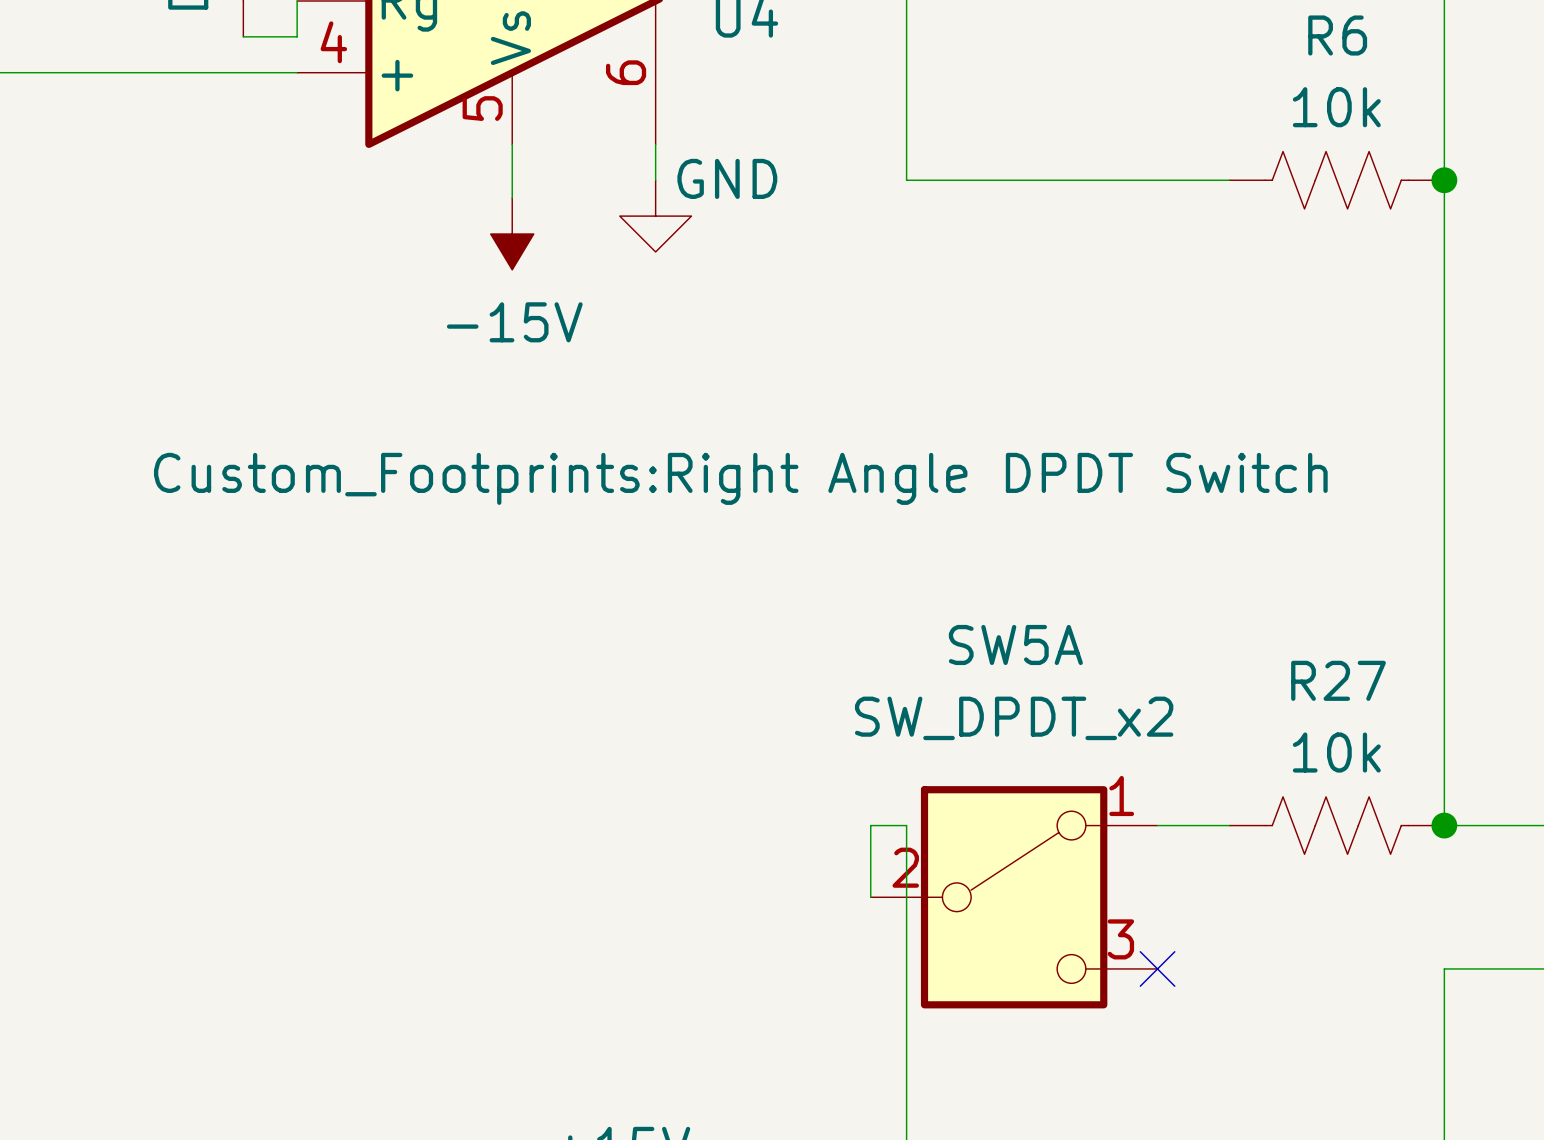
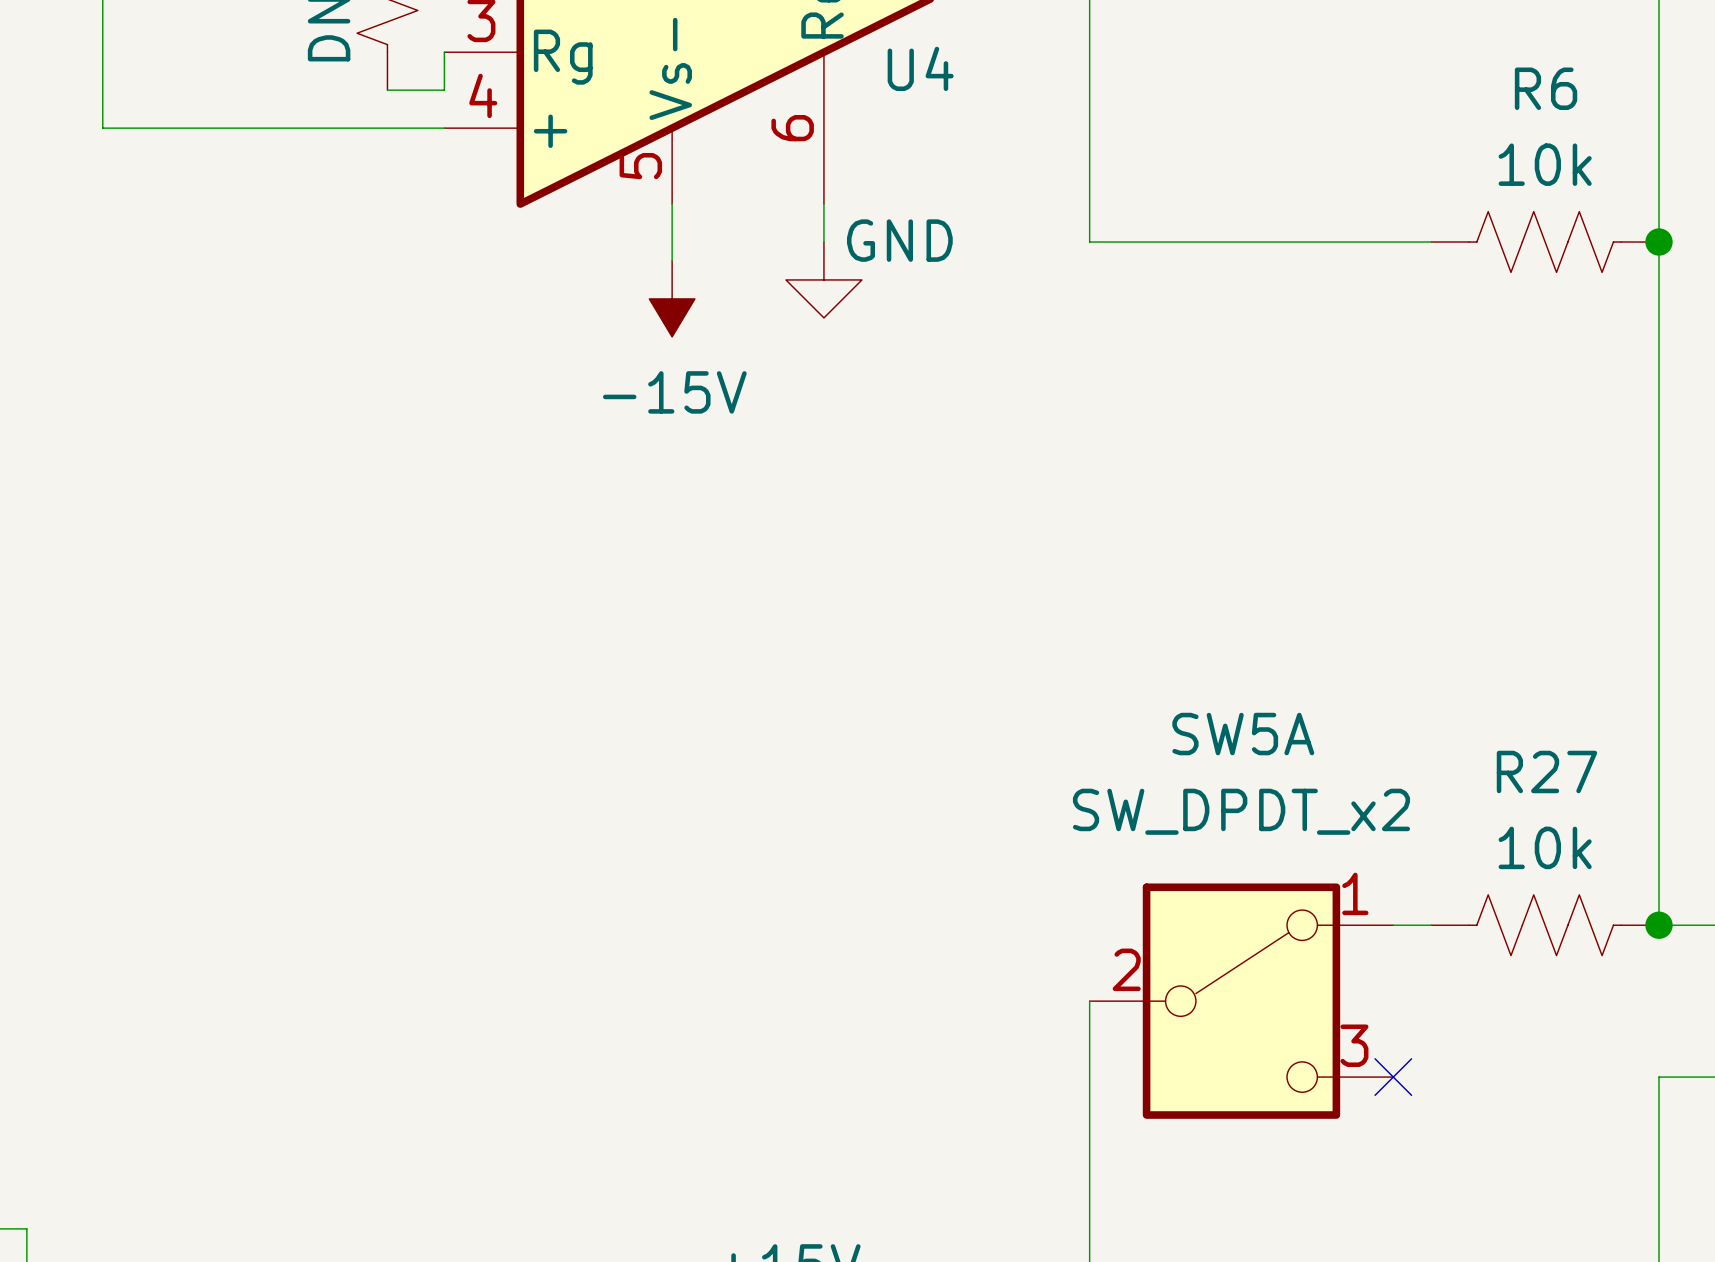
SW5A text: Custom_Footprints:Right Angle DPDT Switch (740, 478) -> none
wire: (870, 897) (870, 825) (906, 825) (906, 897) -> none
SW5A position: (1014, 897) -> (1241, 1001)
no-connect mark position: (1157, 968) -> (1393, 1077)

